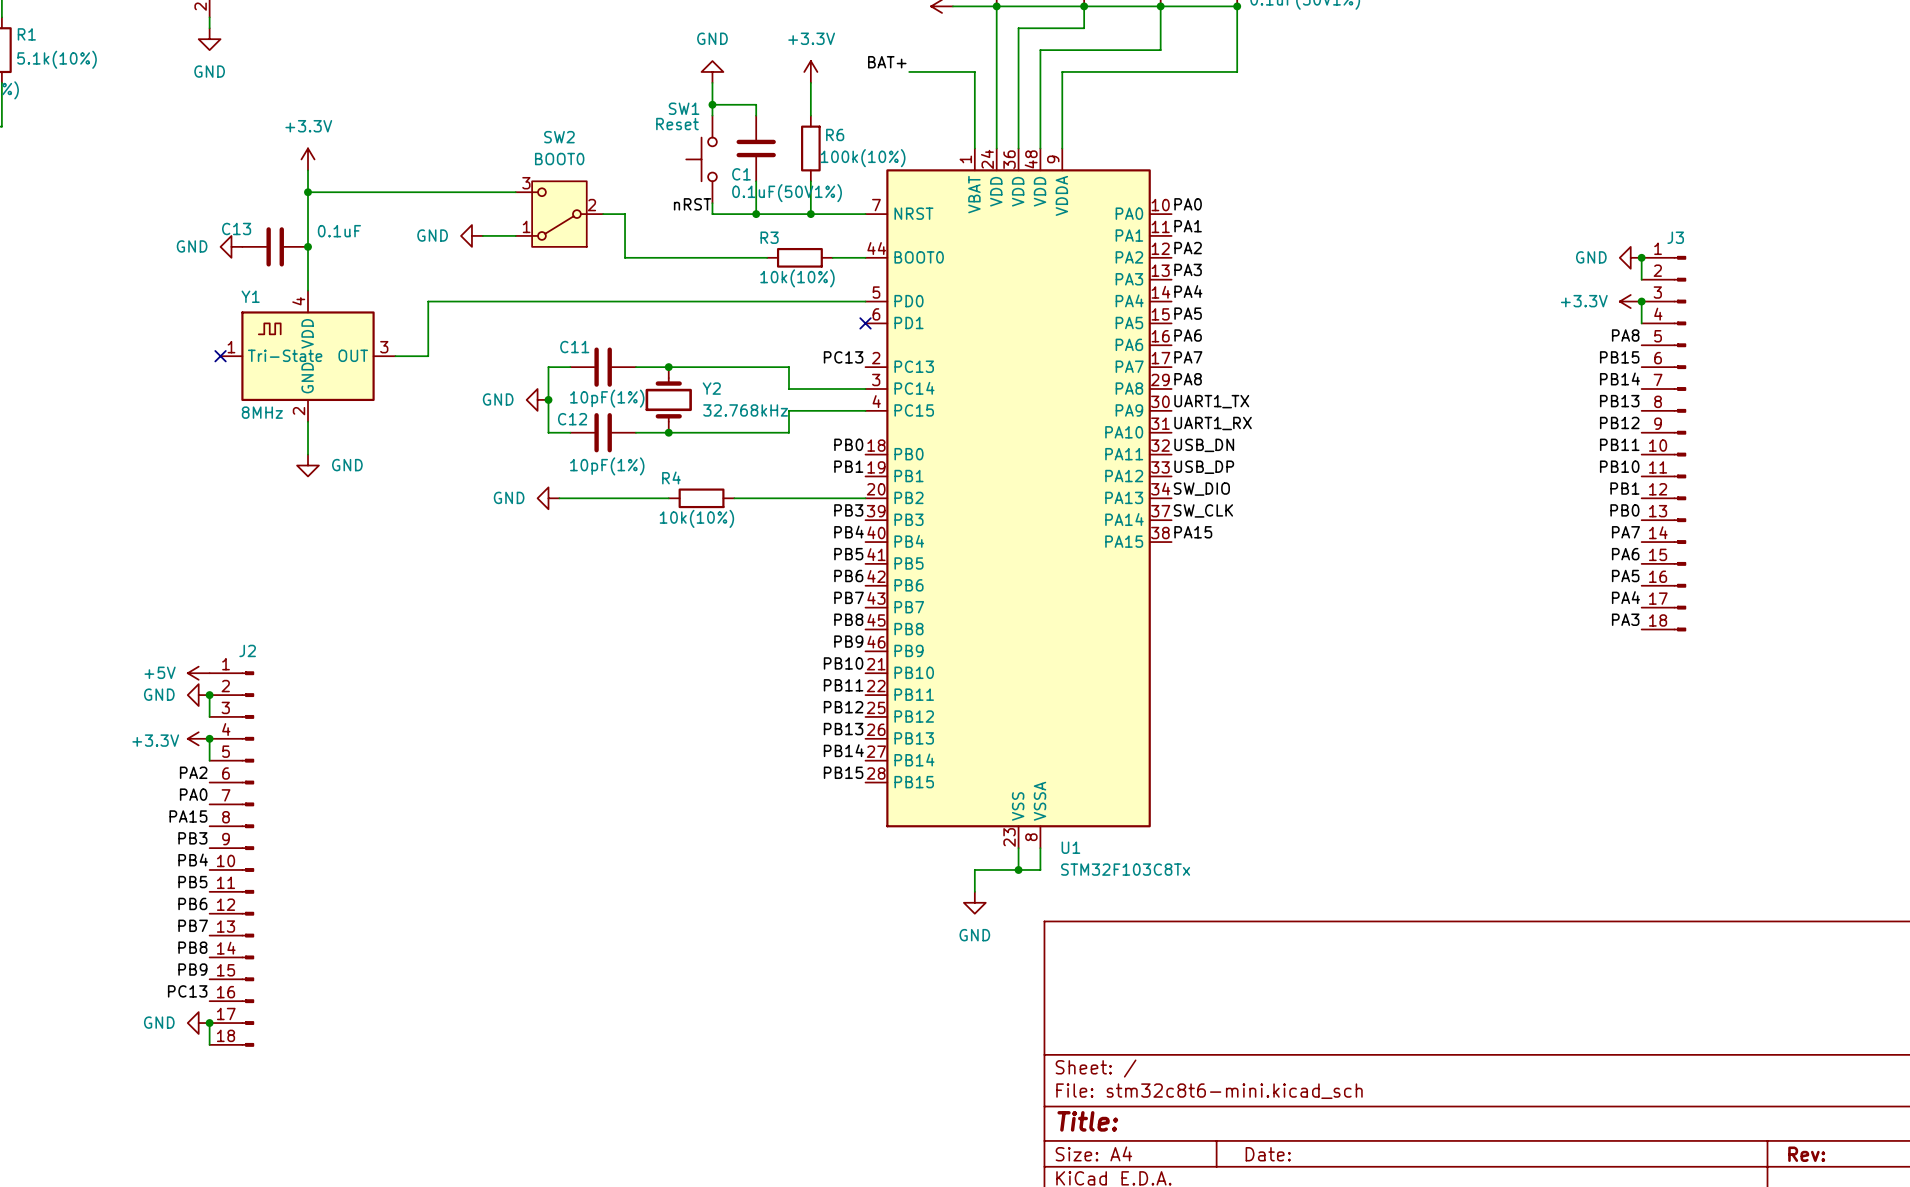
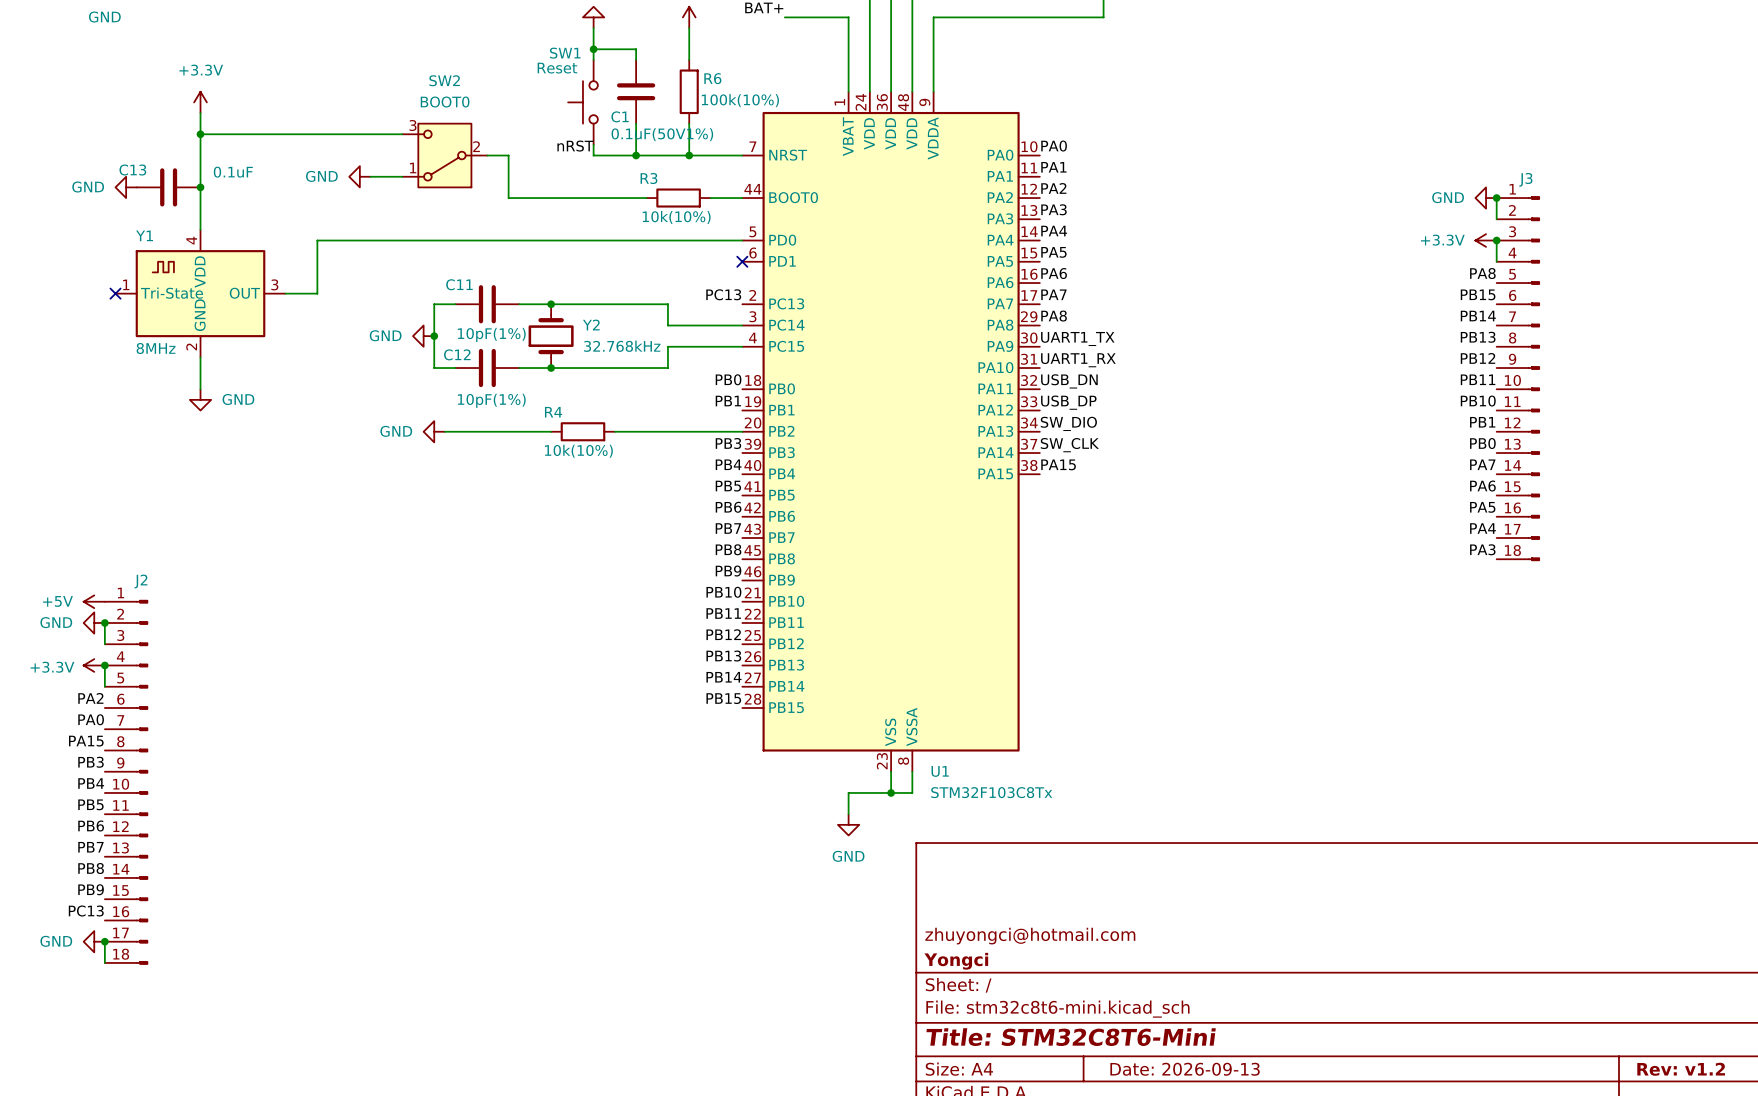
title block: none -> zhuyongci@hotmail.com (1030, 936)
title block: none -> Yongci (956, 961)
title block: Title: (1087, 1121) -> Title: STM32C8T6-Mini (1071, 1037)
title block: Date: (1268, 1154) -> Date: 2026-09-13 (1185, 1069)
title block: Rev: (1806, 1154) -> Rev: v1.2 (1681, 1069)

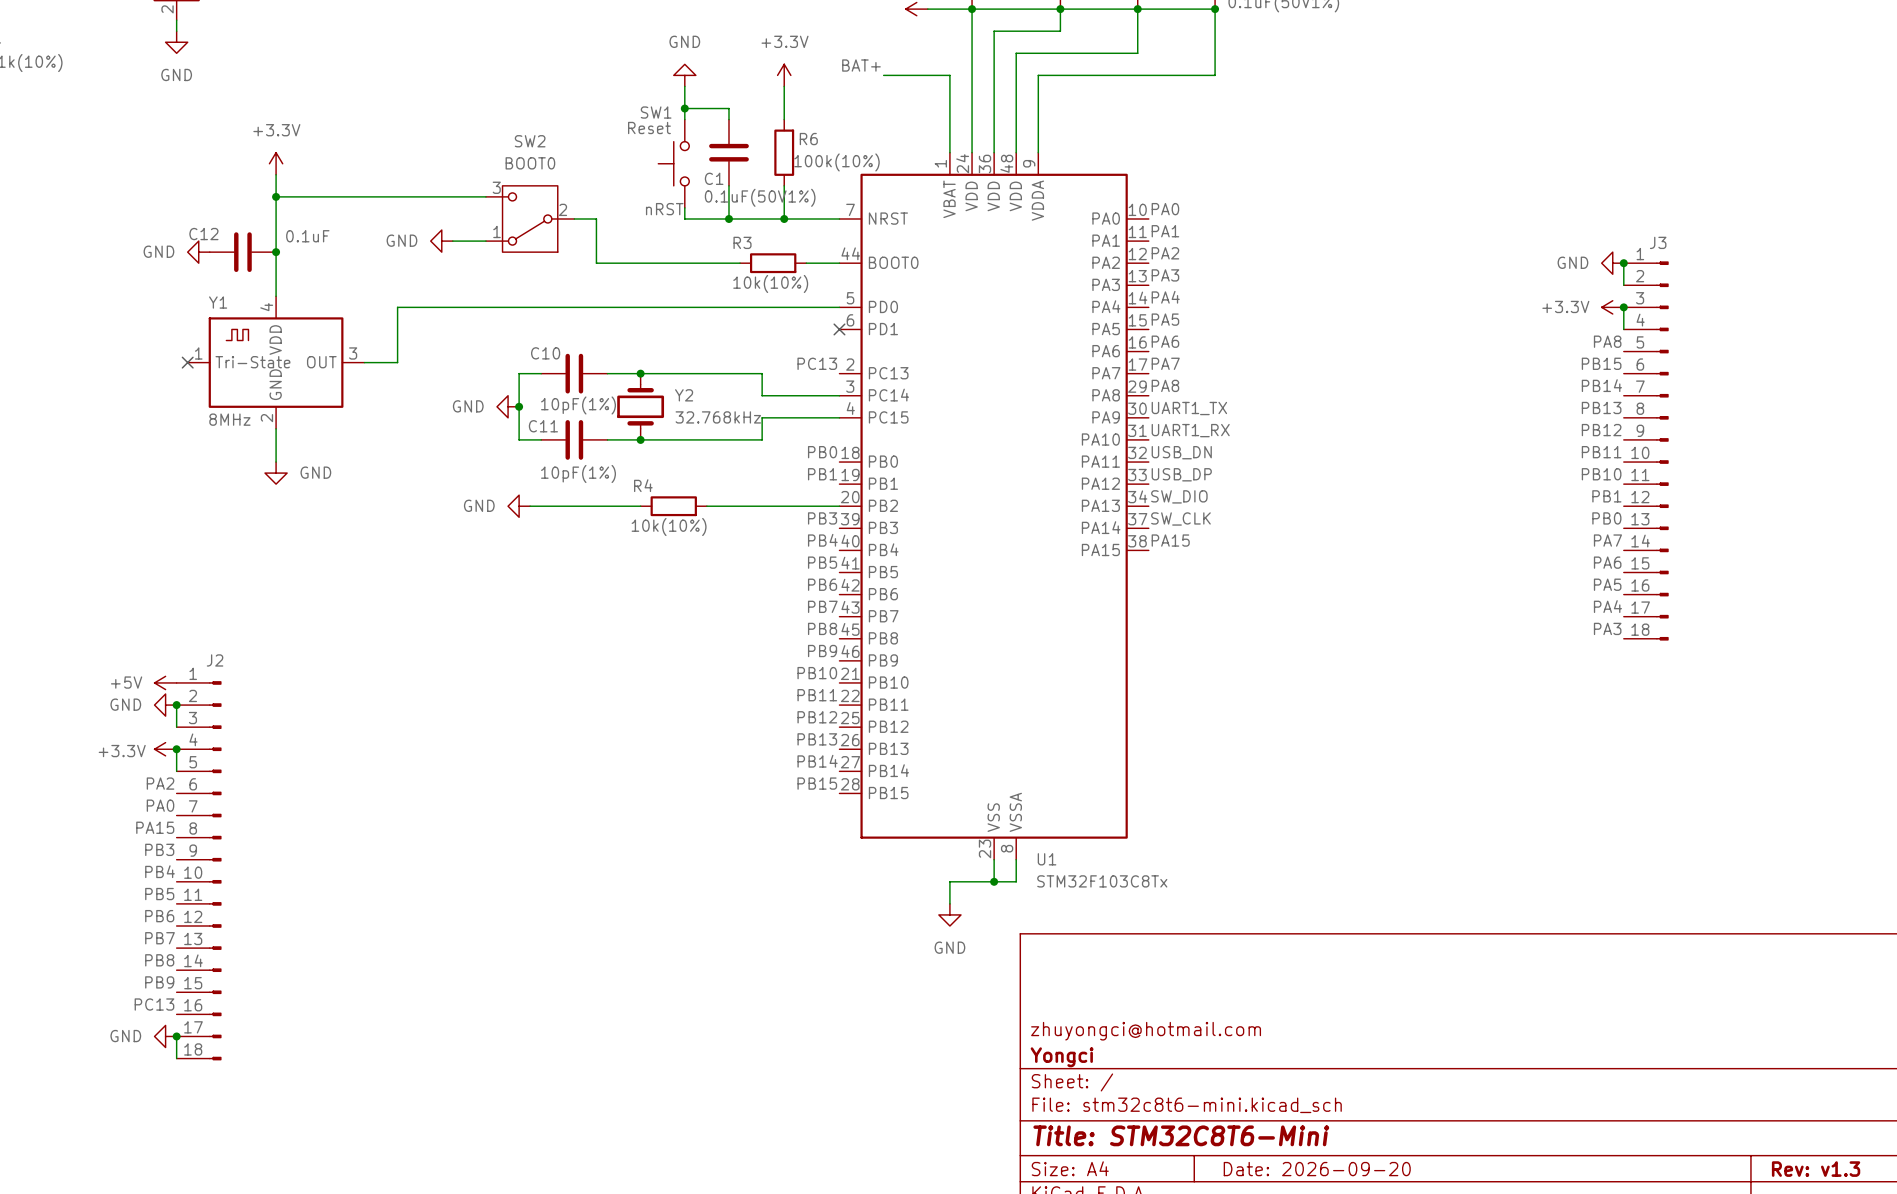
C13 name: C13 (132, 170) -> C12 (203, 234)
C11 name: C11 (459, 284) -> C10 (545, 353)
C12 name: C12 (457, 354) -> C11 (543, 426)
title block: Date: 2026-09-13 (1185, 1069) -> Date: 2026-09-20 (1317, 1169)
title block: Rev: v1.2 (1681, 1069) -> Rev: v1.3 (1816, 1169)

